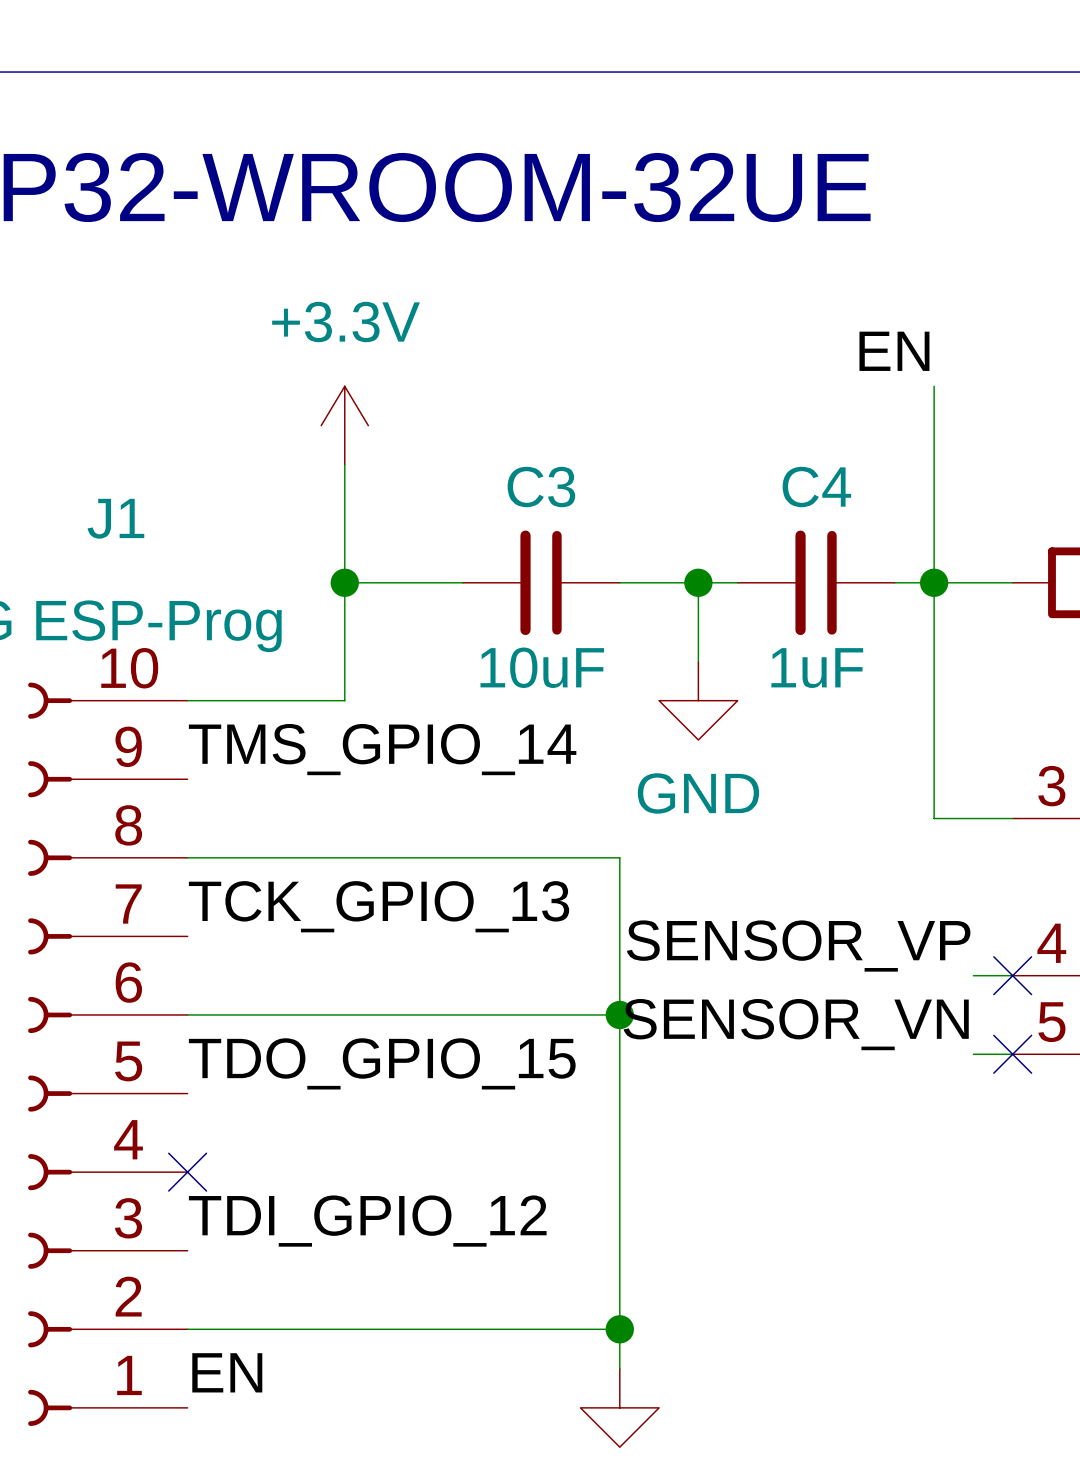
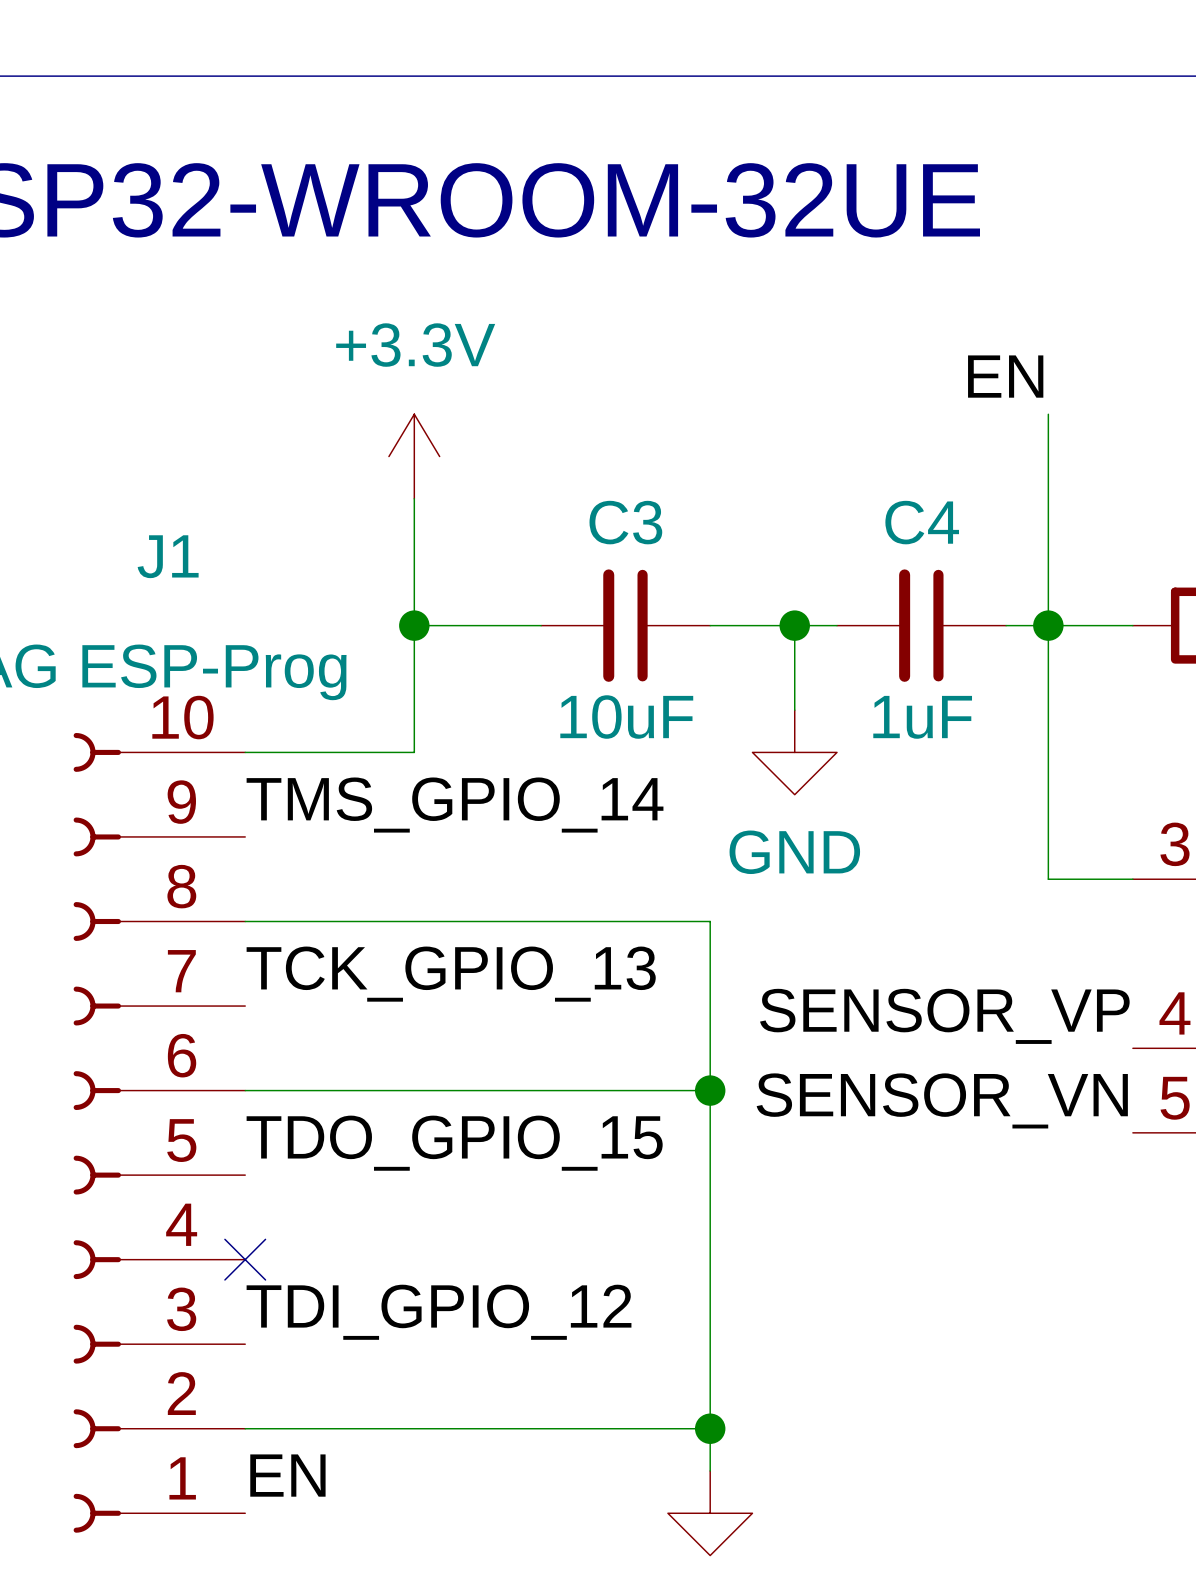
label position: SENSOR_VP (798, 946) -> SENSOR_VP (944, 1016)
wire: (973, 975) (1012, 975) -> none
no-connect mark: (1012, 975) -> none
label position: SENSOR_VN (796, 1024) -> SENSOR_VN (942, 1100)
wire: (973, 1054) (1012, 1054) -> none
no-connect mark: (1012, 1054) -> none

